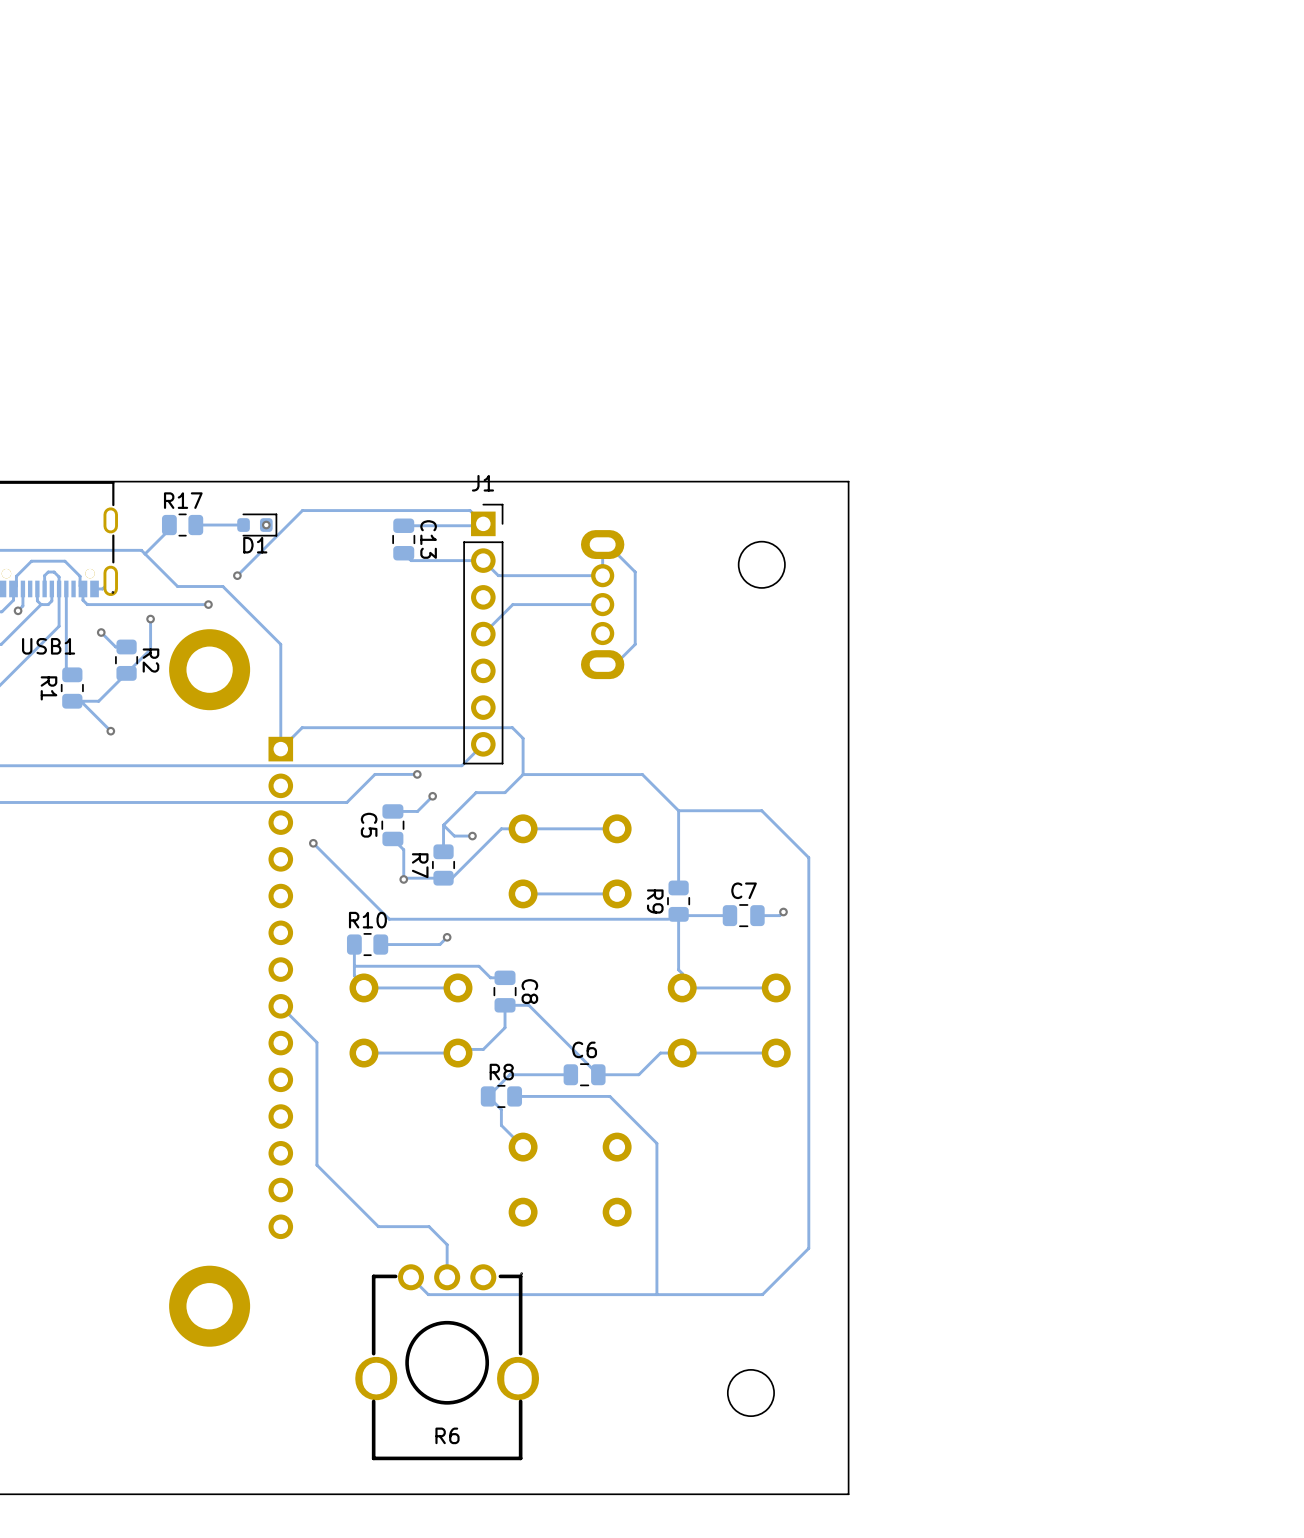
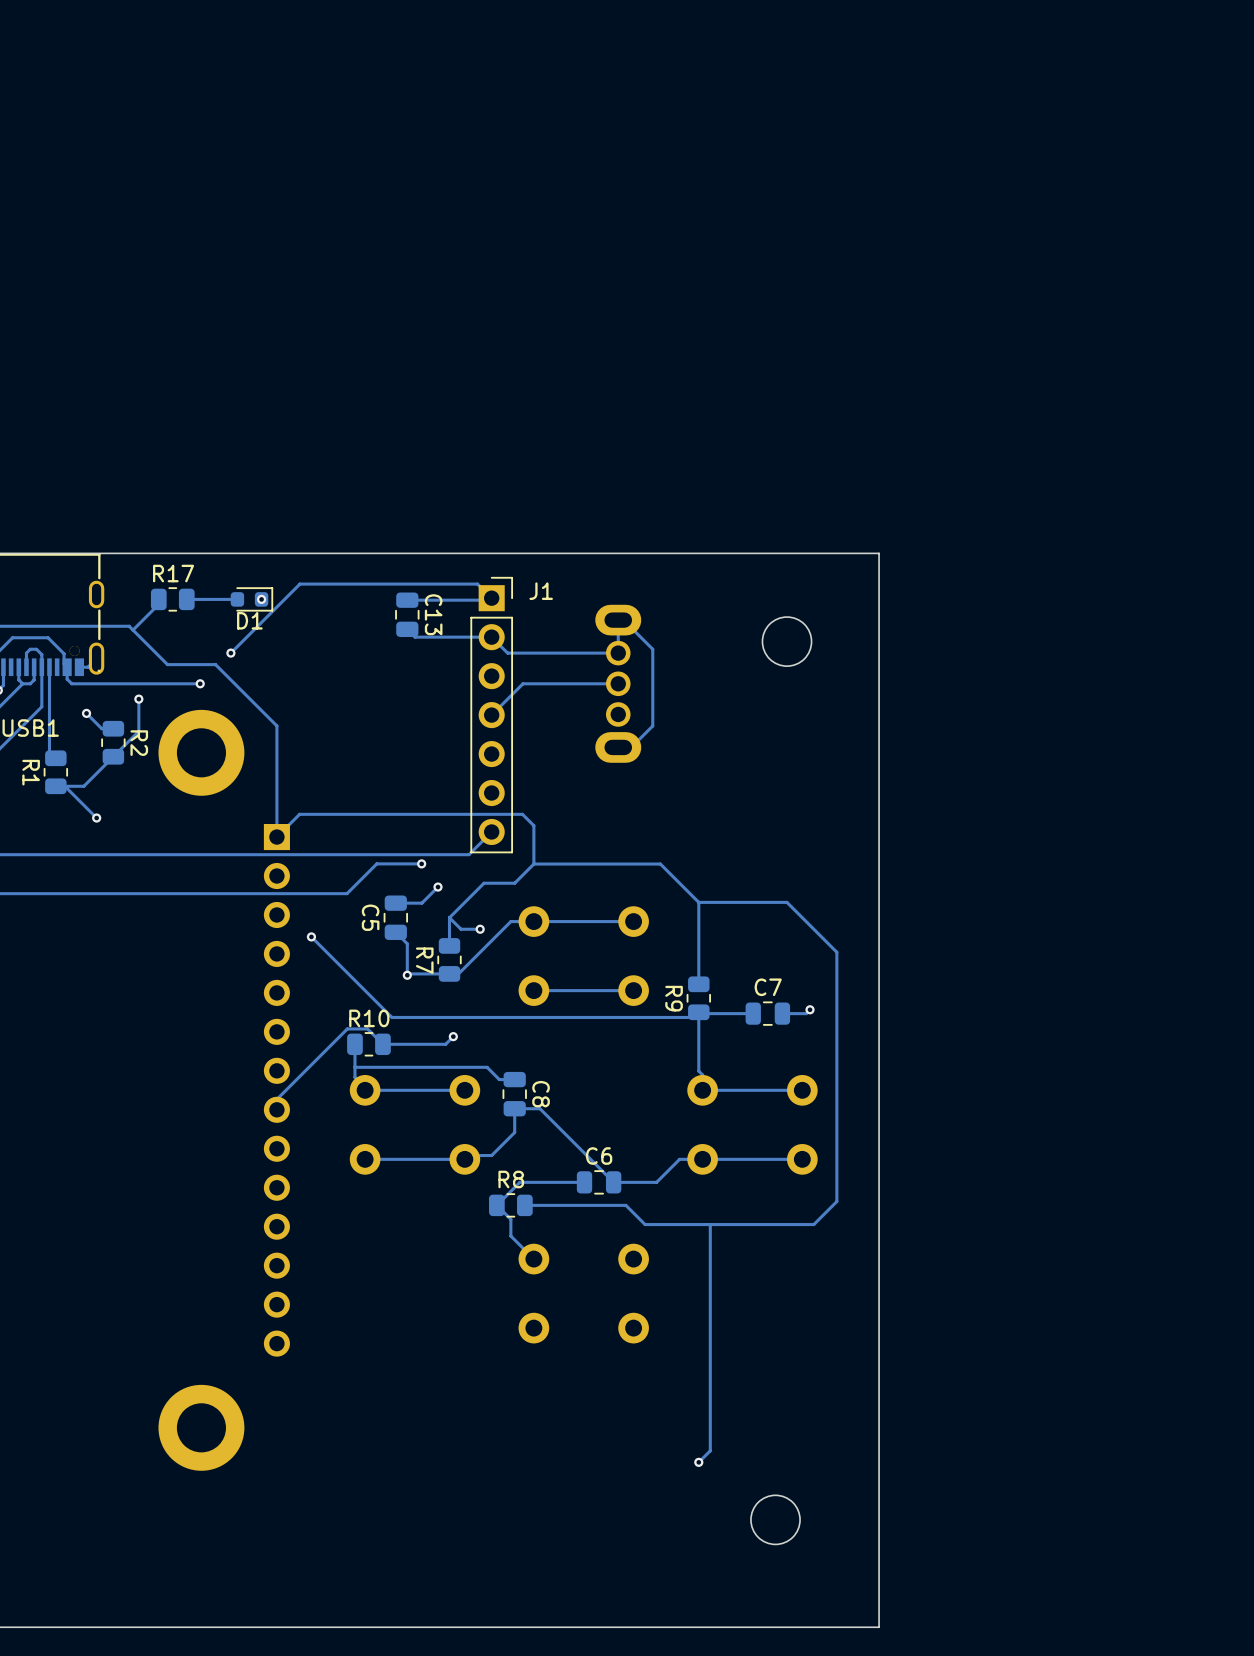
J1 name position: J1 (482, 483) -> J1 (541, 591)
track: (280, 1006) (316, 1042) (316, 1165) (378, 1226) (429, 1226) (447, 1244) (447, 1286) -> (276, 1109) (276, 1099) (347, 1028) (367, 1028) (382, 1044)
track: (808, 1092) (808, 1248) (762, 1294) (428, 1294) (410, 1277) -> none
track: (627, 1114) (656, 1143) (656, 1294) -> (645, 1224) (813, 1224) (836, 1201)
track: none -> (710, 1224) (710, 1450) (698, 1462)
via: none -> (698, 1462)
R6: (447, 1362) -> none

